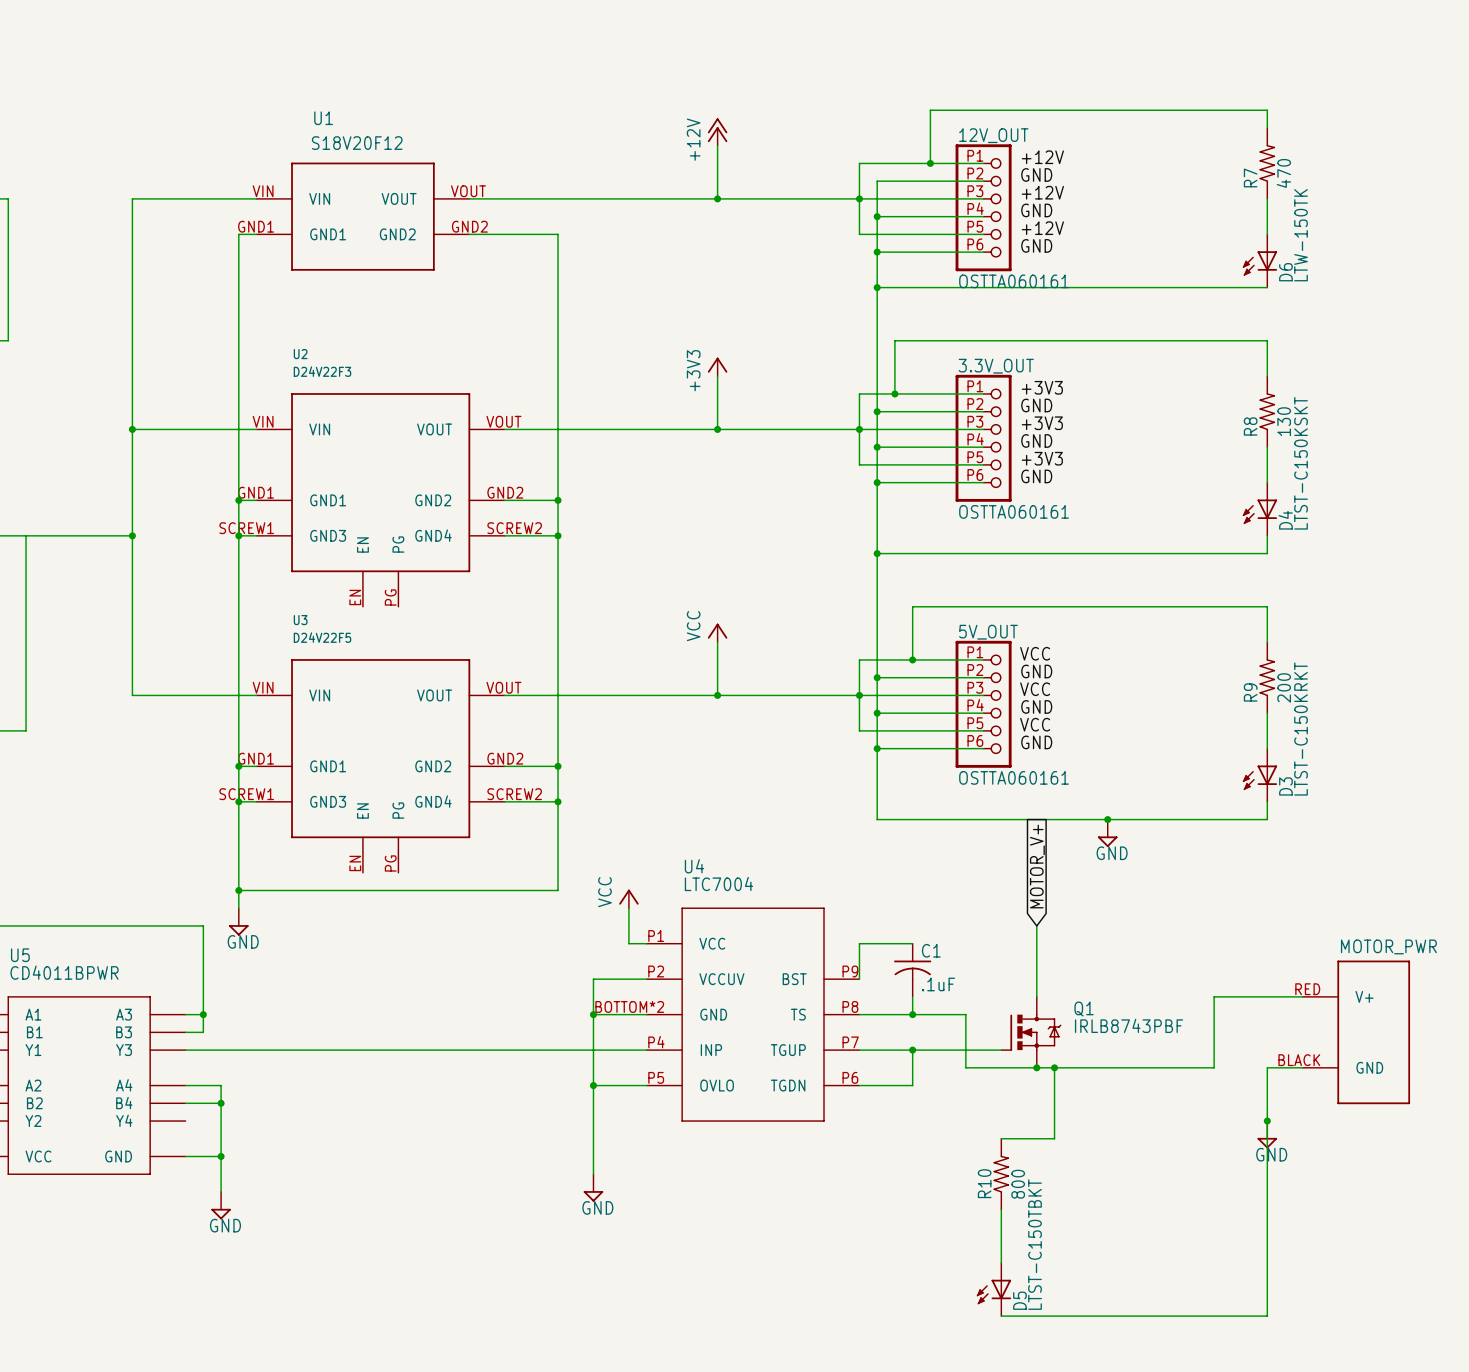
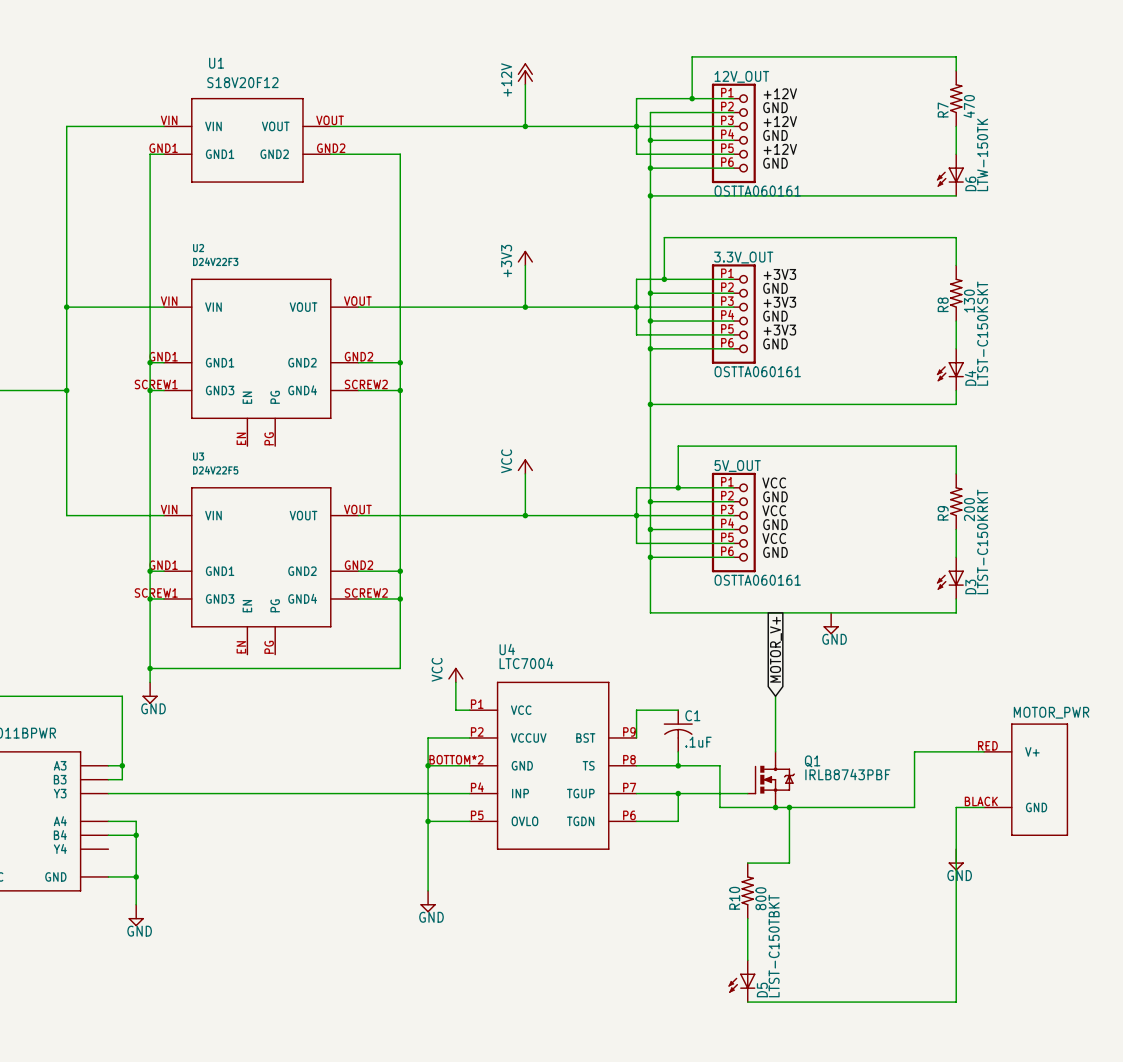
junction: (1107, 819) -> none
junction: (1267, 1121) -> none

